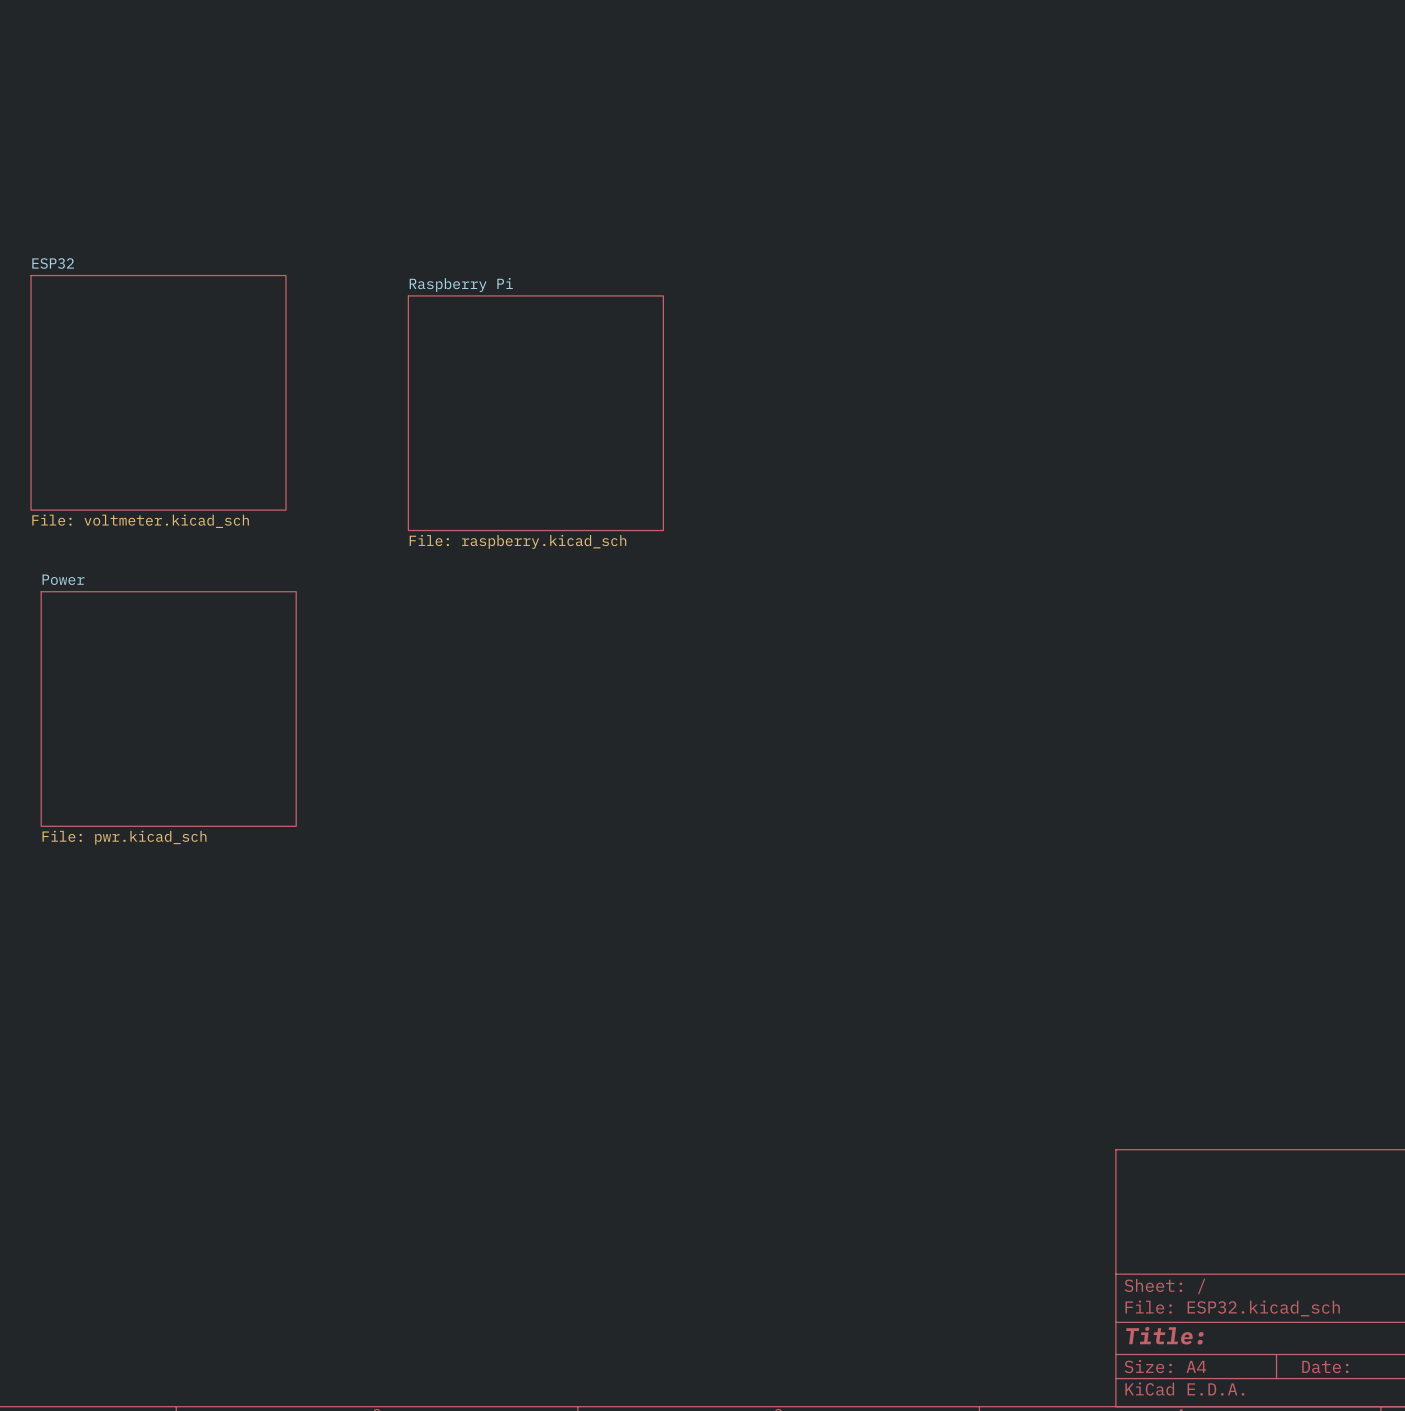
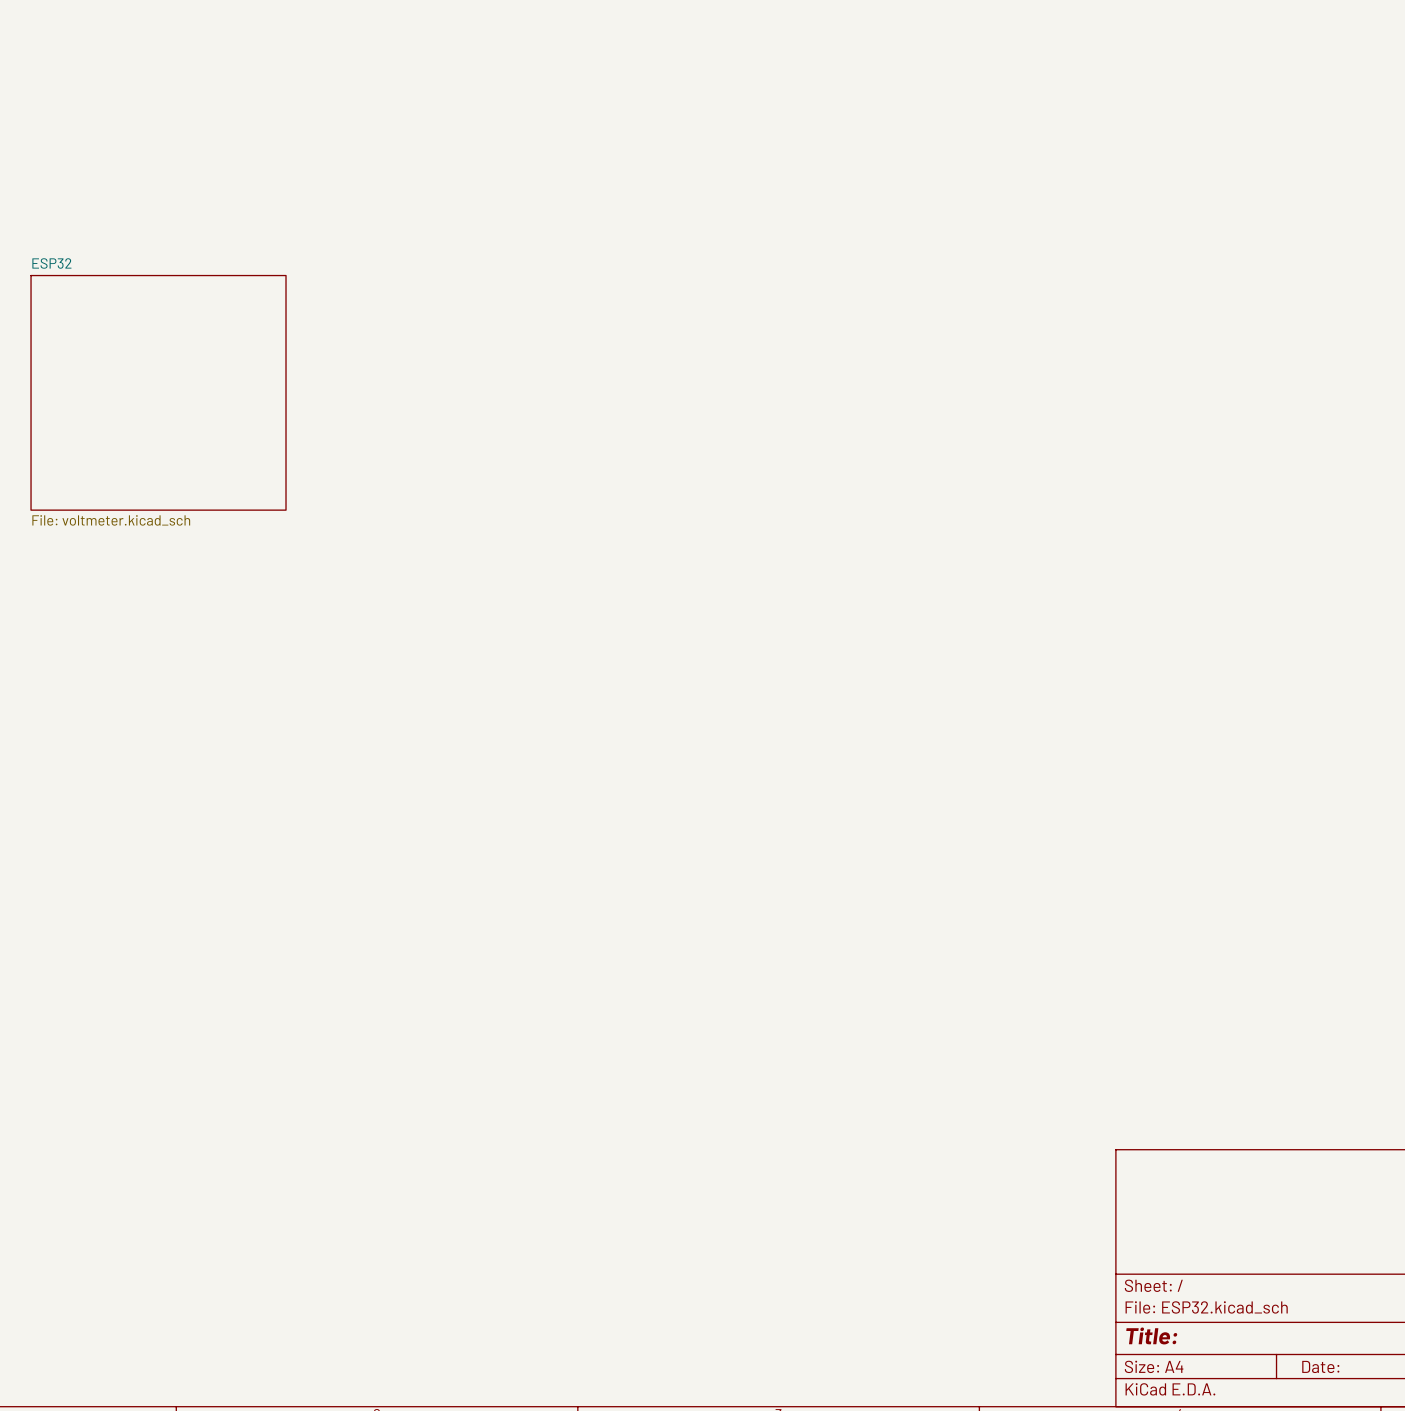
sheet Raspberry Pi: File: raspberry.kicad_sch (535, 413) -> none
sheet Power: File: pwr.kicad_sch (168, 709) -> none

